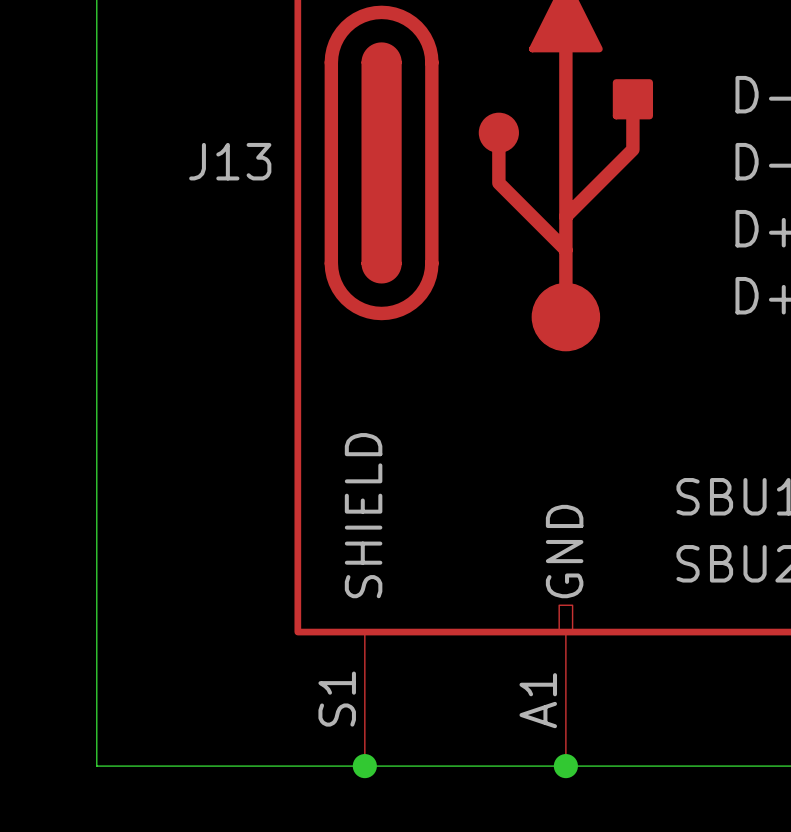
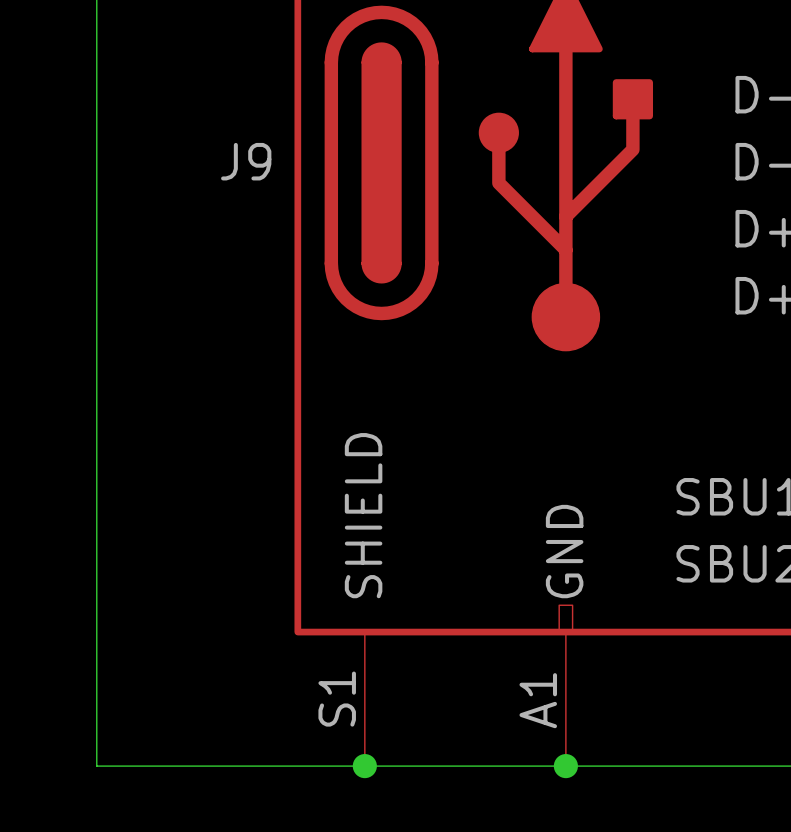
J13 name: J13 (230, 161) -> J9 (246, 161)

